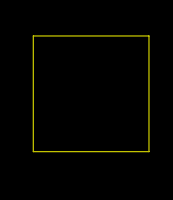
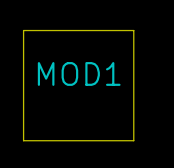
MOD1: none -> (79, 73)

